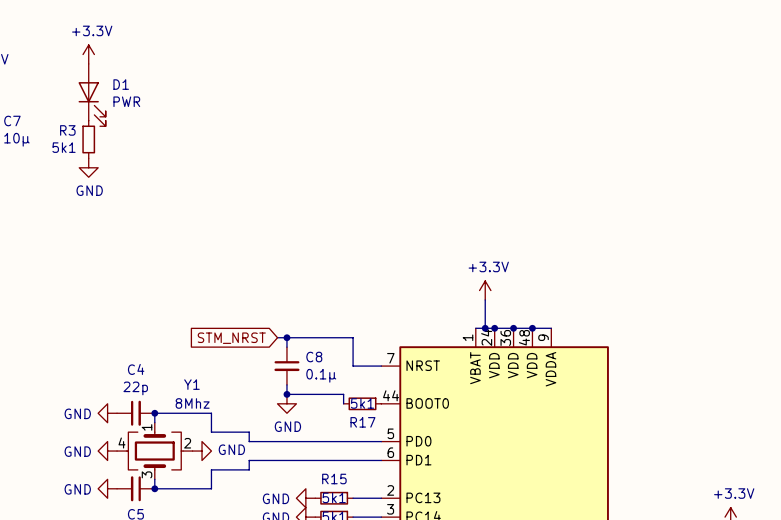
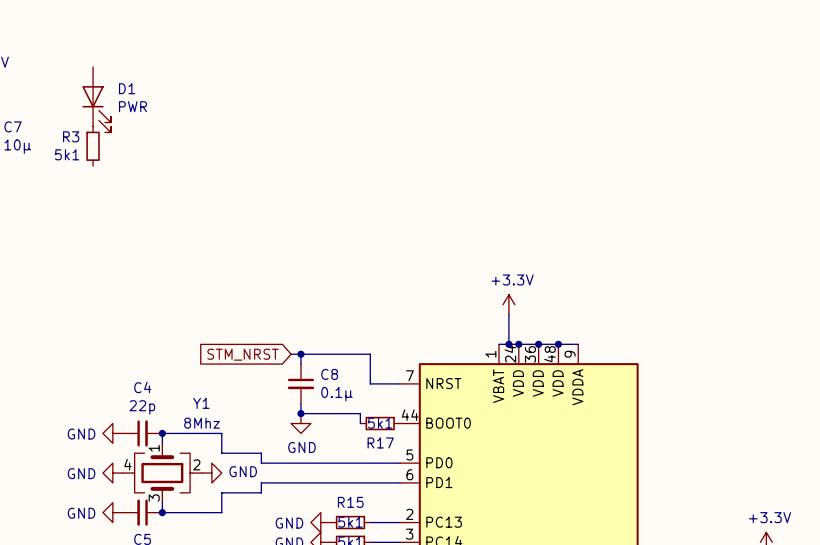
power symbol: +3.3V (88, 54) -> none
power symbol: GND (88, 167) -> none

